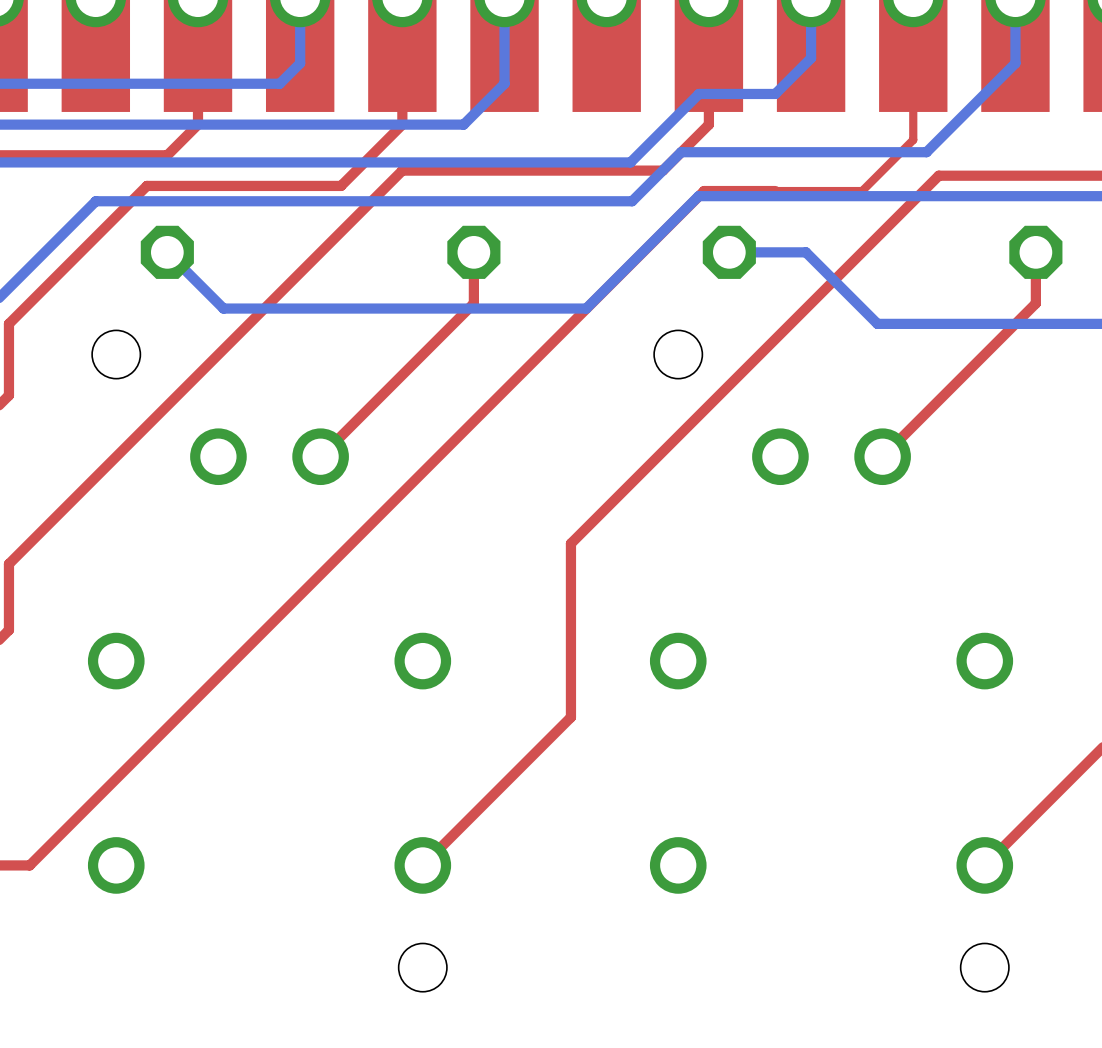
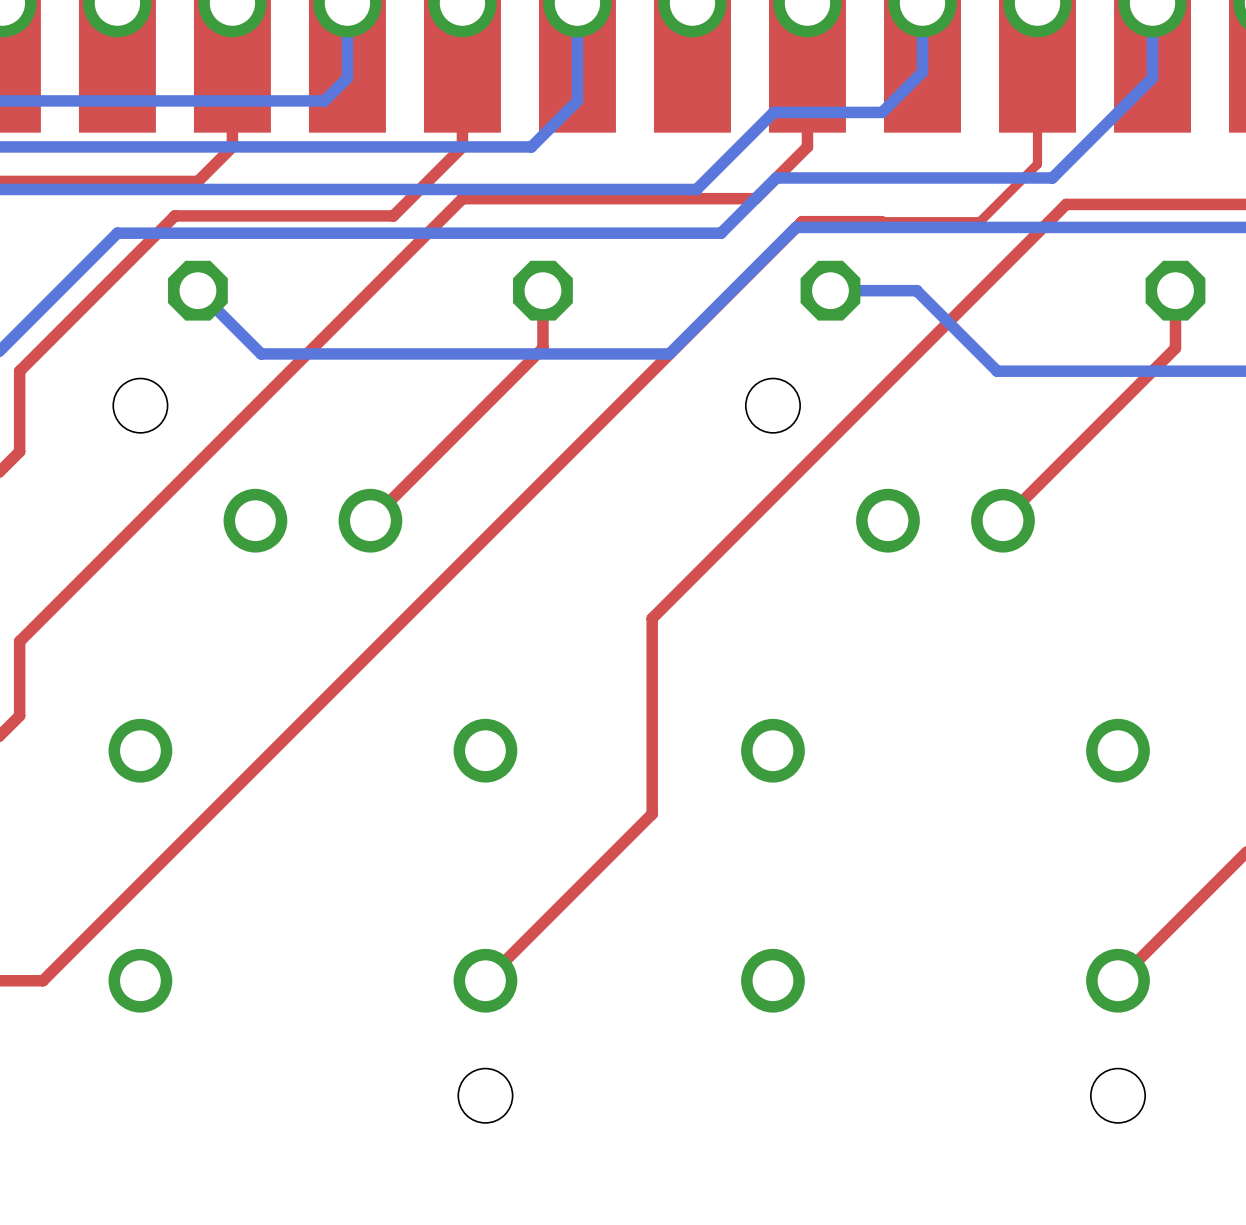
bottom track: (699, 93) (630, 162) (610, 162) -> (796, 112) (773, 112) (696, 189)

